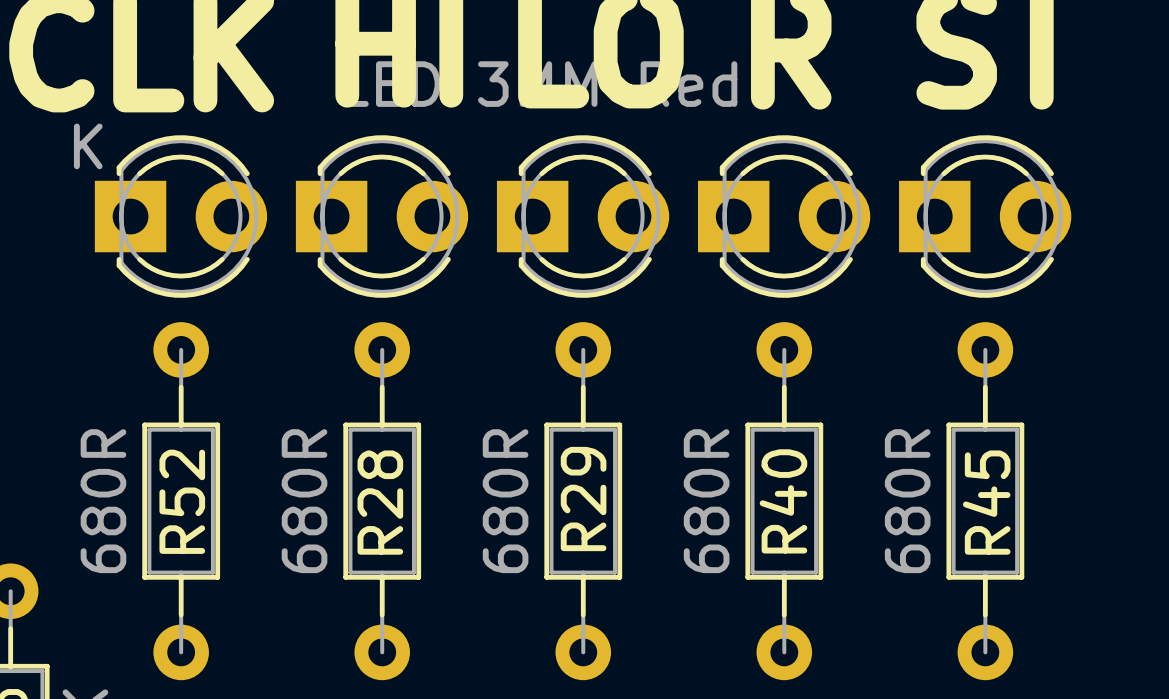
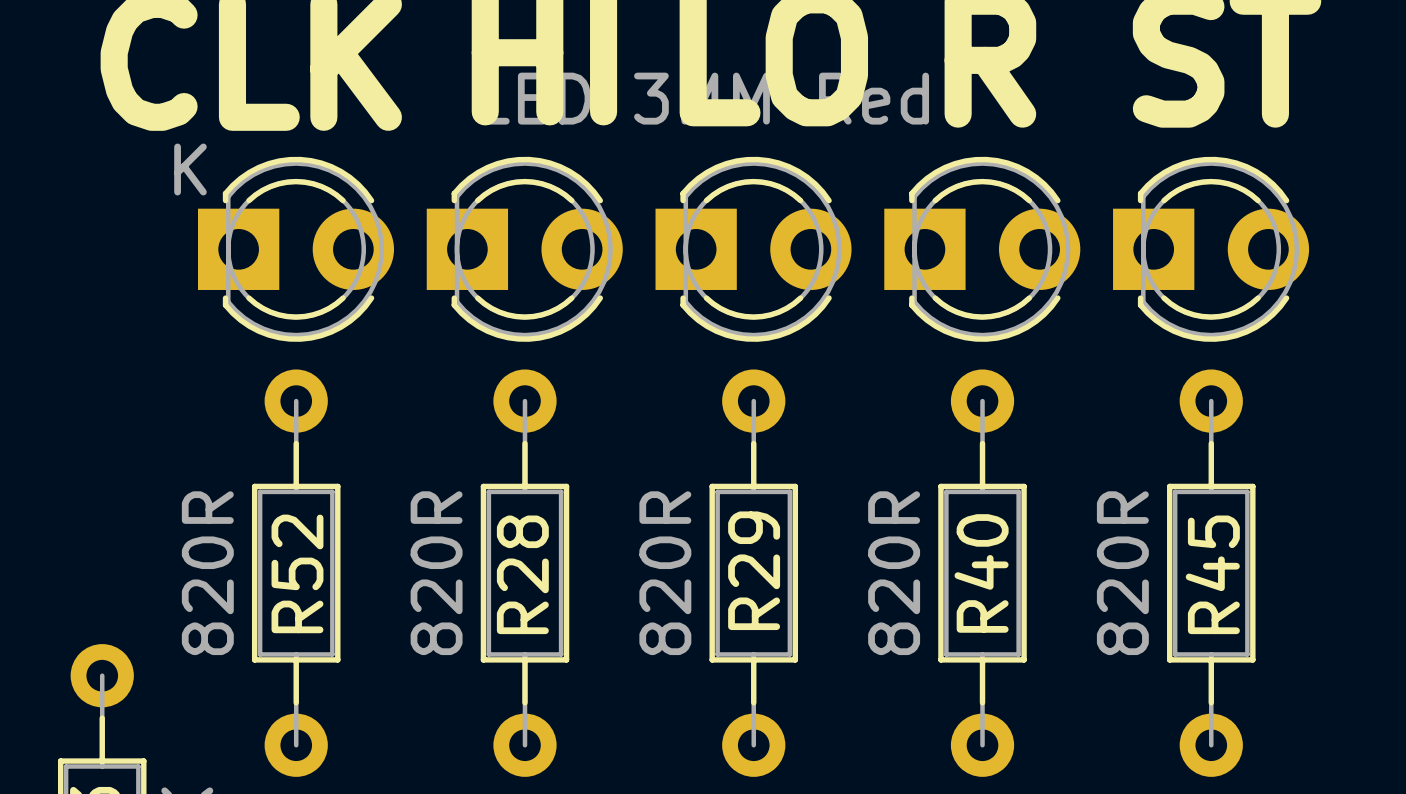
R52 value: 680R (103, 501) -> 820R (207, 573)
R28 value: 680R (304, 501) -> 820R (436, 573)
R29 value: 680R (505, 501) -> 820R (665, 573)
R40 value: 680R (706, 501) -> 820R (894, 573)
R45 value: 680R (907, 501) -> 820R (1122, 573)

